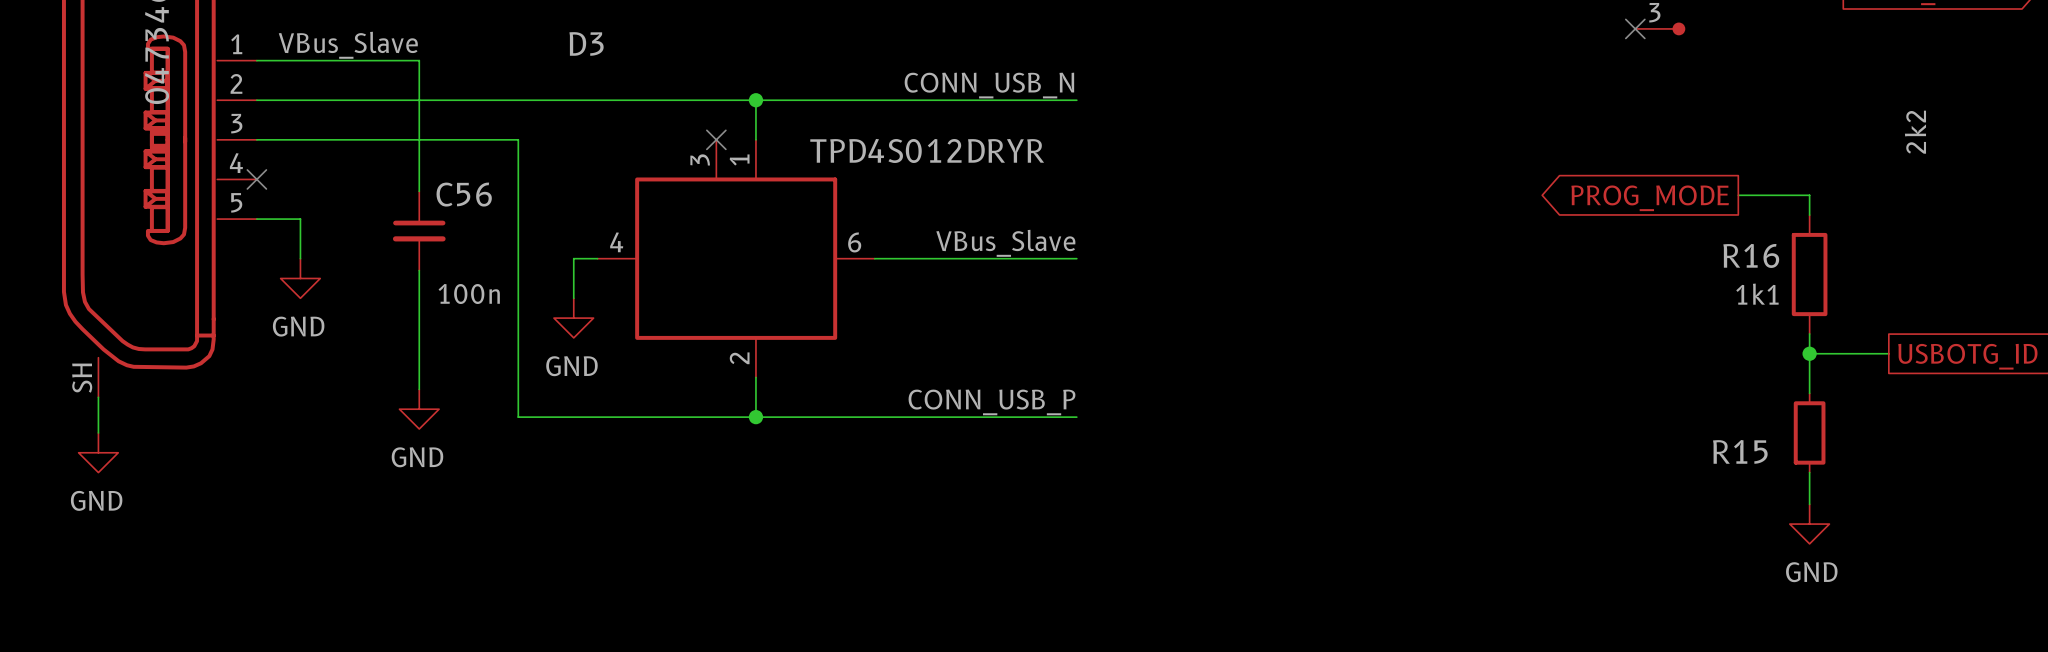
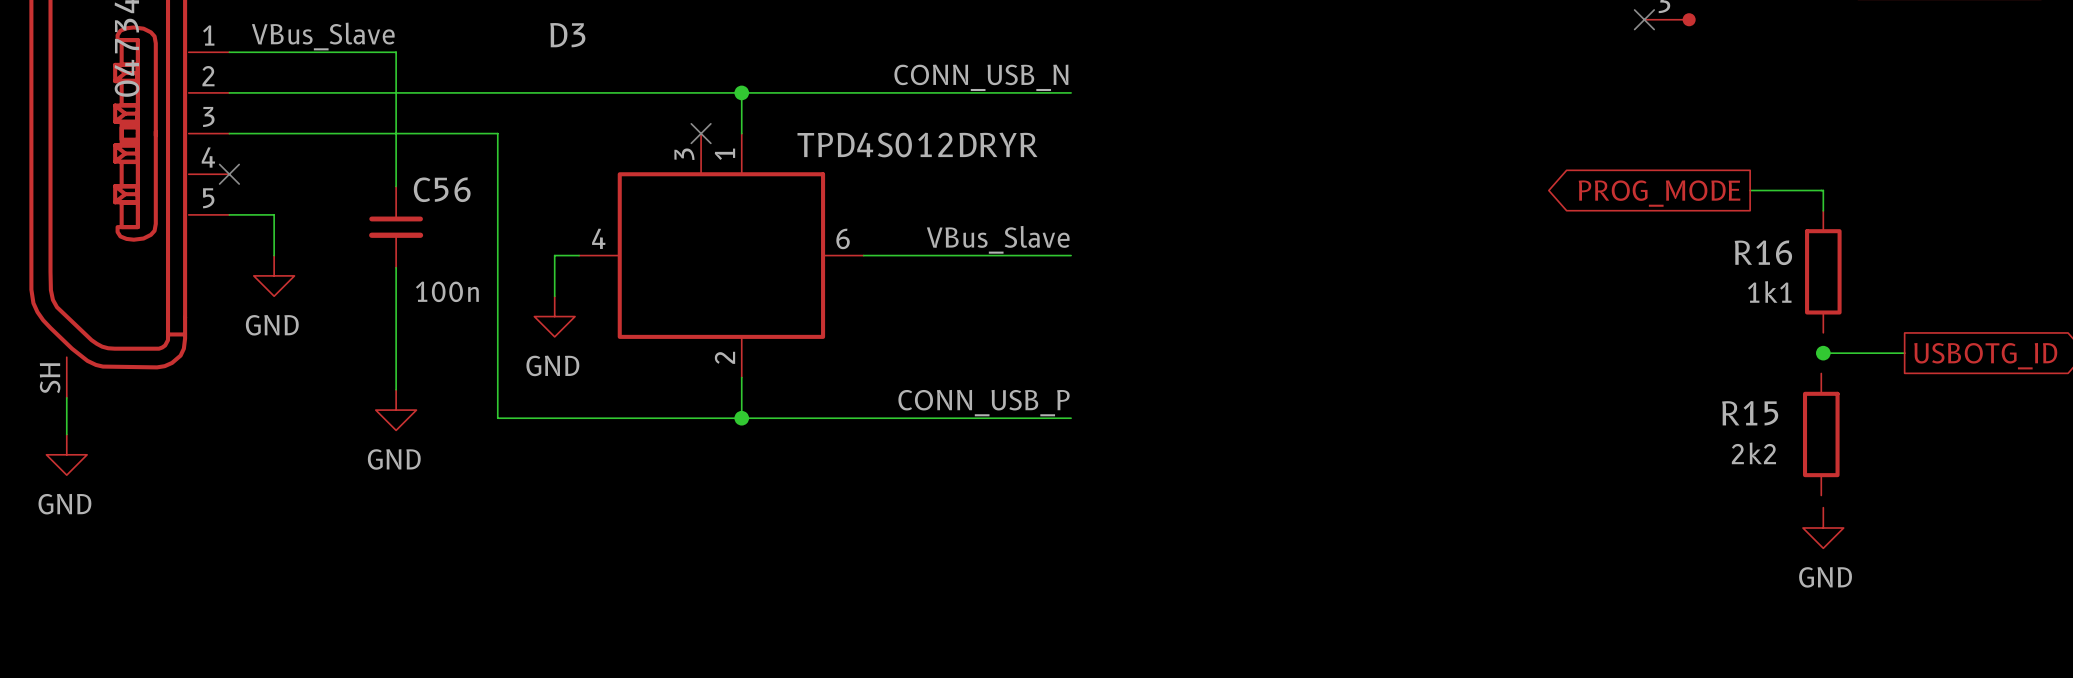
R15 text position: 2k2 (1915, 132) -> 2k2 (1753, 453)
wire: (1809, 333) (1809, 393) -> none
R15 symbol: [1793, 393, 1826, 473] -> [1802, 373, 1840, 496]
R15 name position: R15 (1740, 451) -> R15 (1750, 413)
wire: (1809, 472) (1809, 504) -> none

